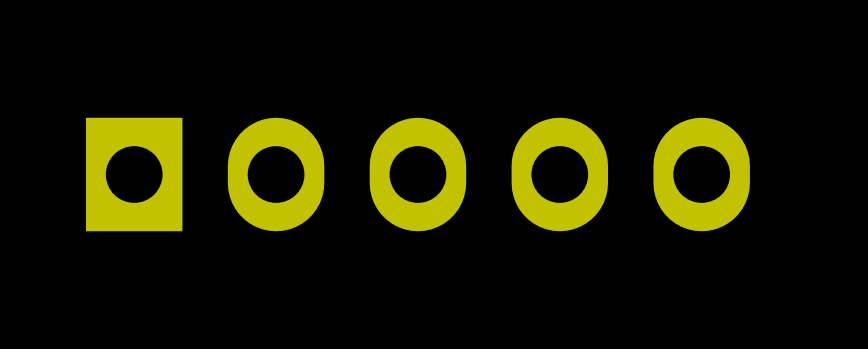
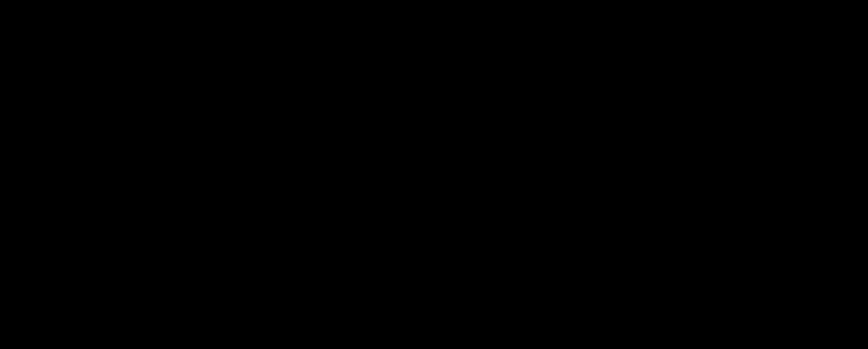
part: (417, 174) -> none

